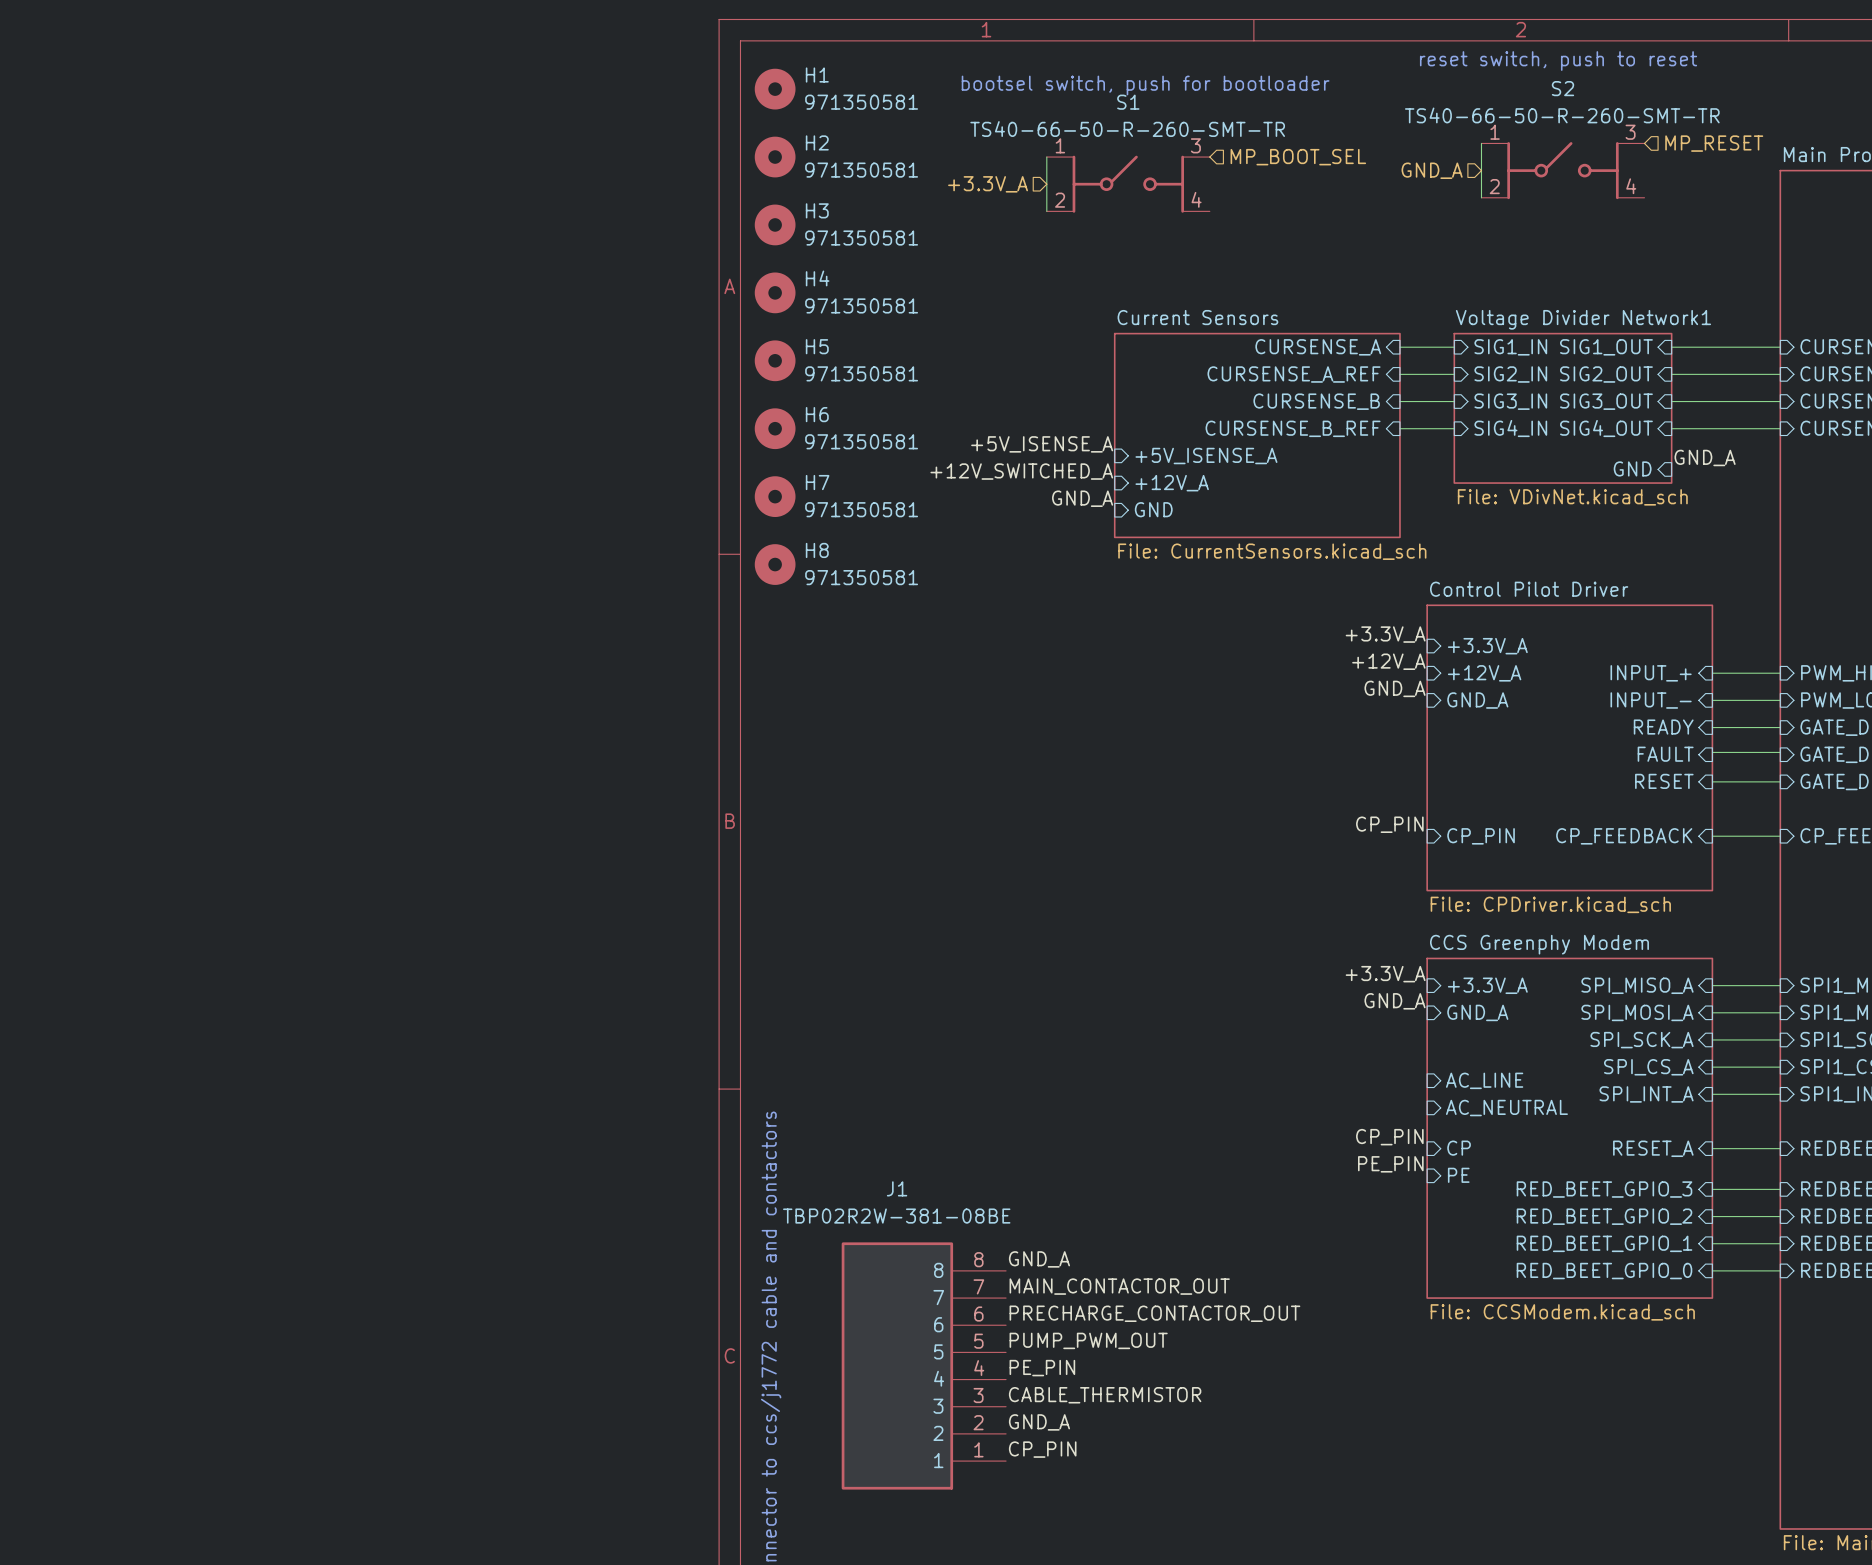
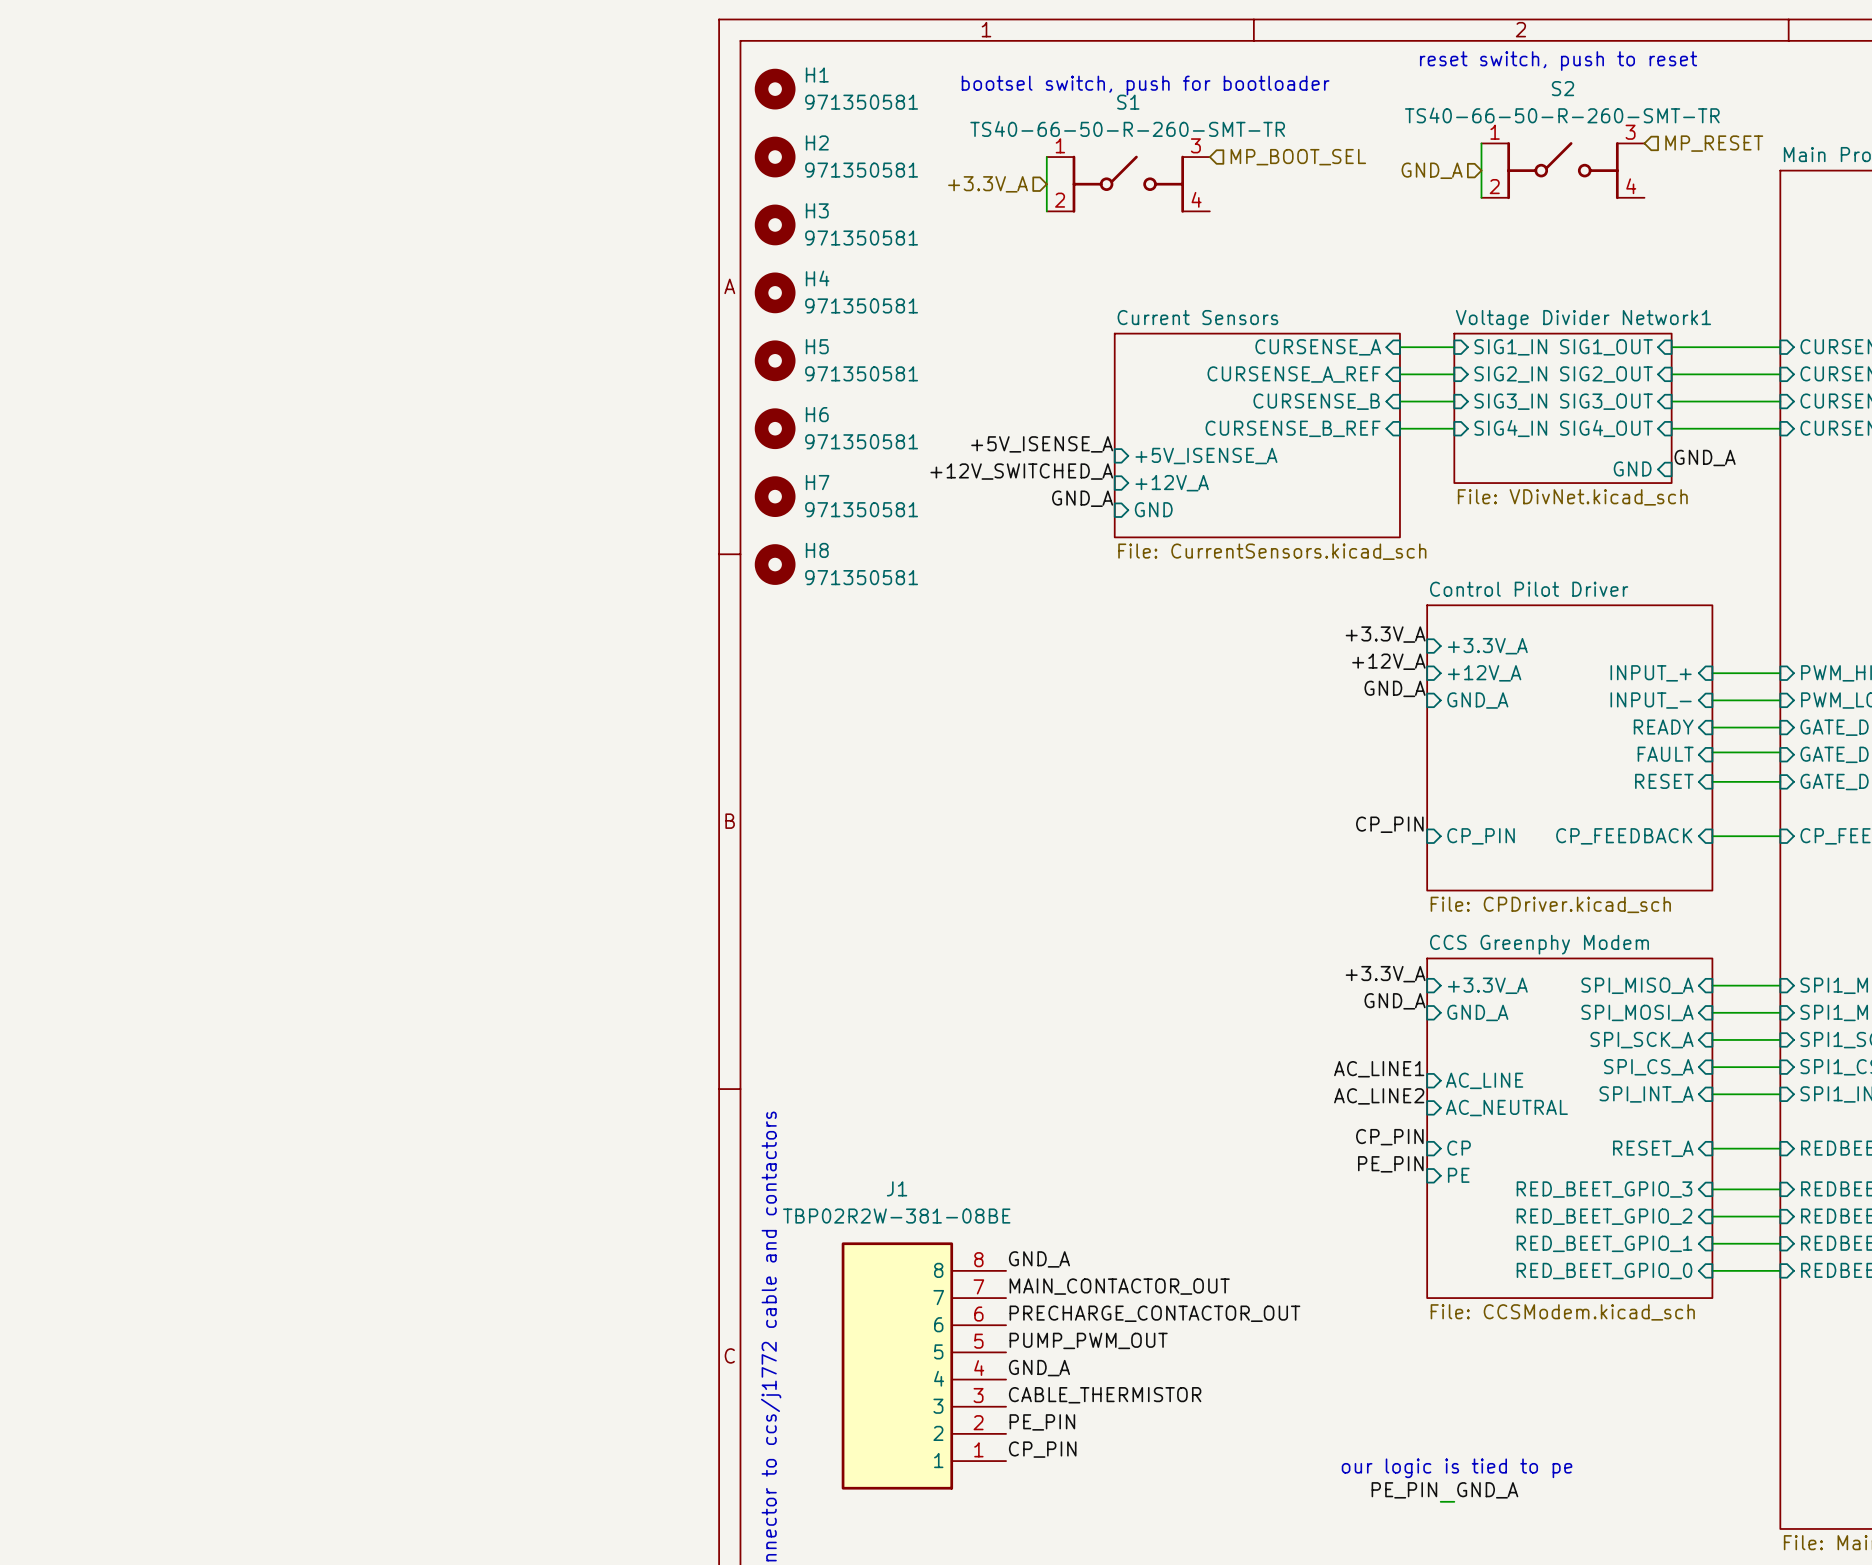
label: none -> AC_LINE1 (1379, 1069)
label: none -> AC_LINE2 (1379, 1096)
label: PE_PIN (1042, 1368) -> GND_A (1039, 1368)
label: GND_A (1039, 1422) -> PE_PIN (1042, 1422)
text: none -> our logic is tied to pe (1457, 1468)
label: none -> PE_PIN (1404, 1490)
label: none -> GND_A (1487, 1490)
wire: none -> (1440, 1501) (1454, 1501)

